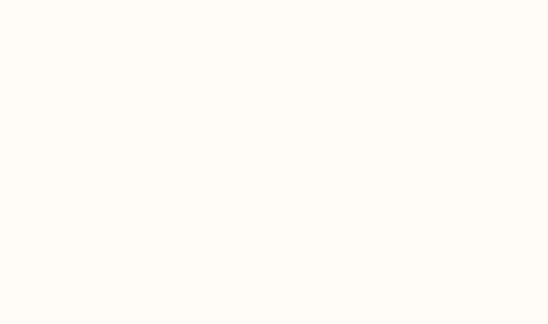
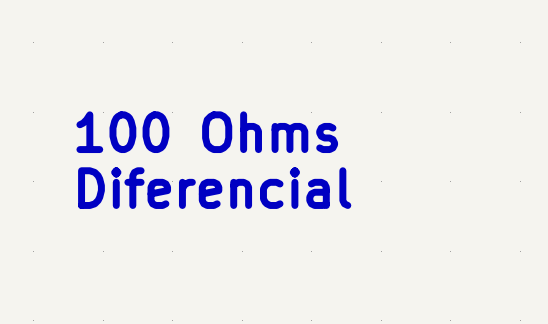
text: none -> 100 Ohms (207, 132)
text: none -> Diferencial (214, 188)

